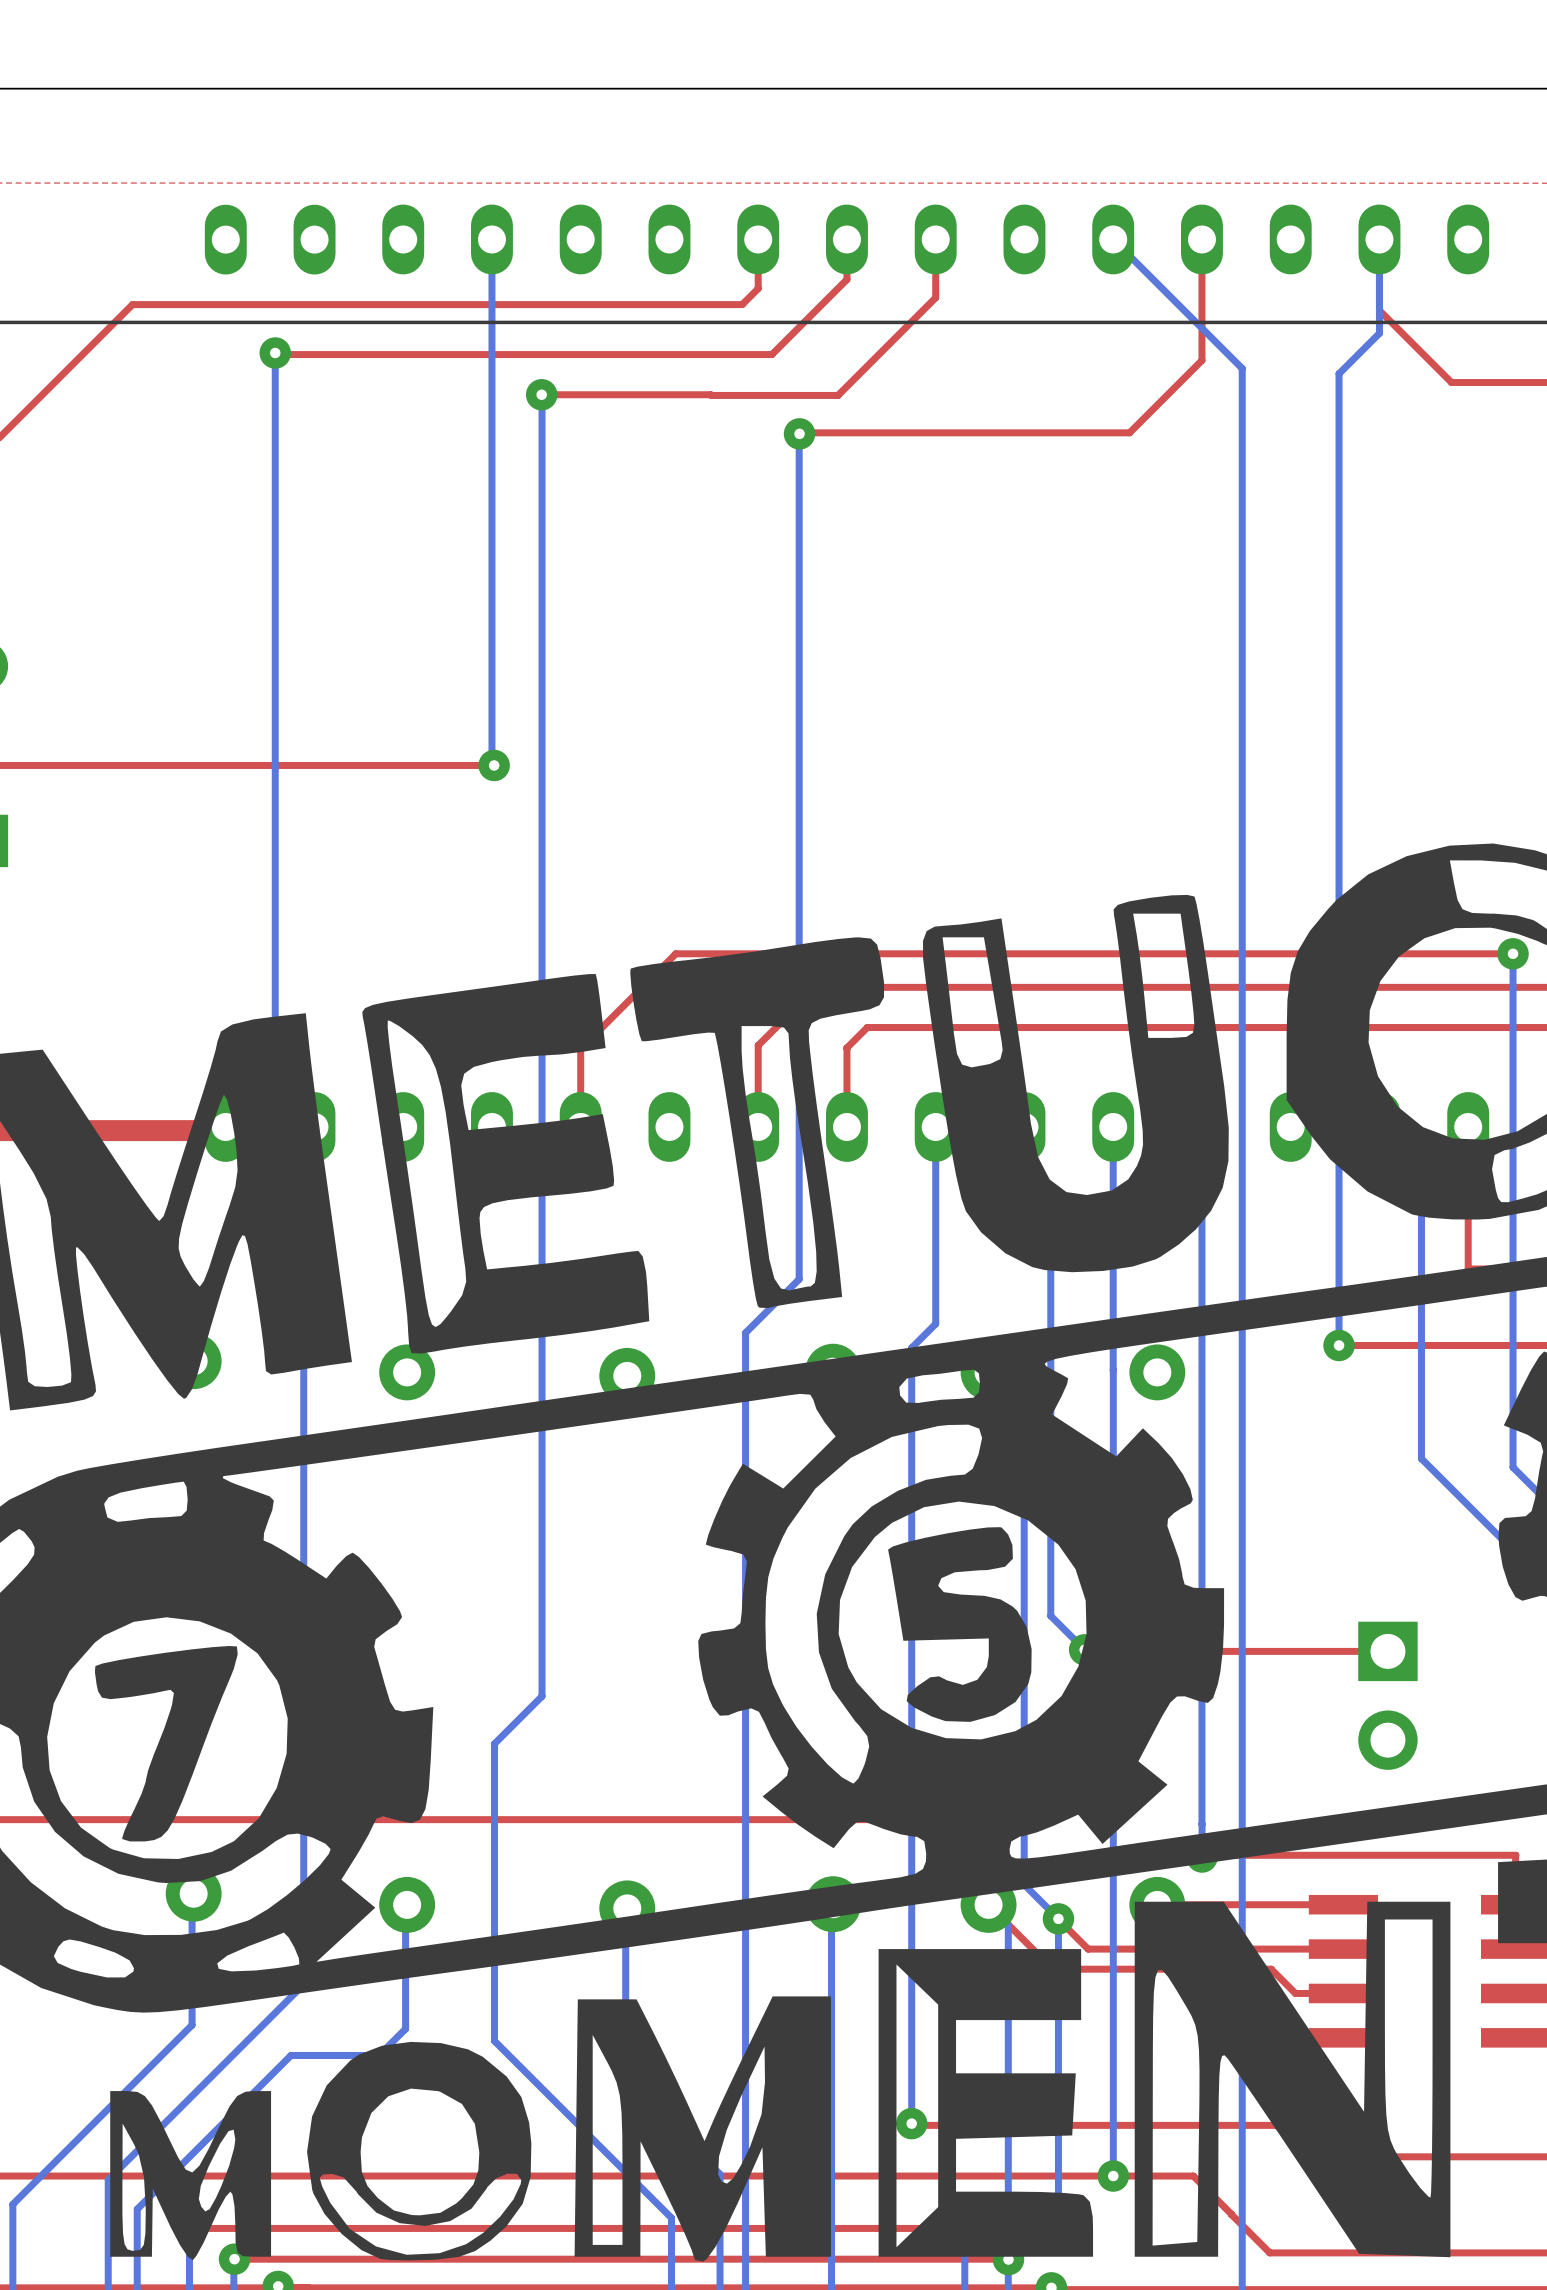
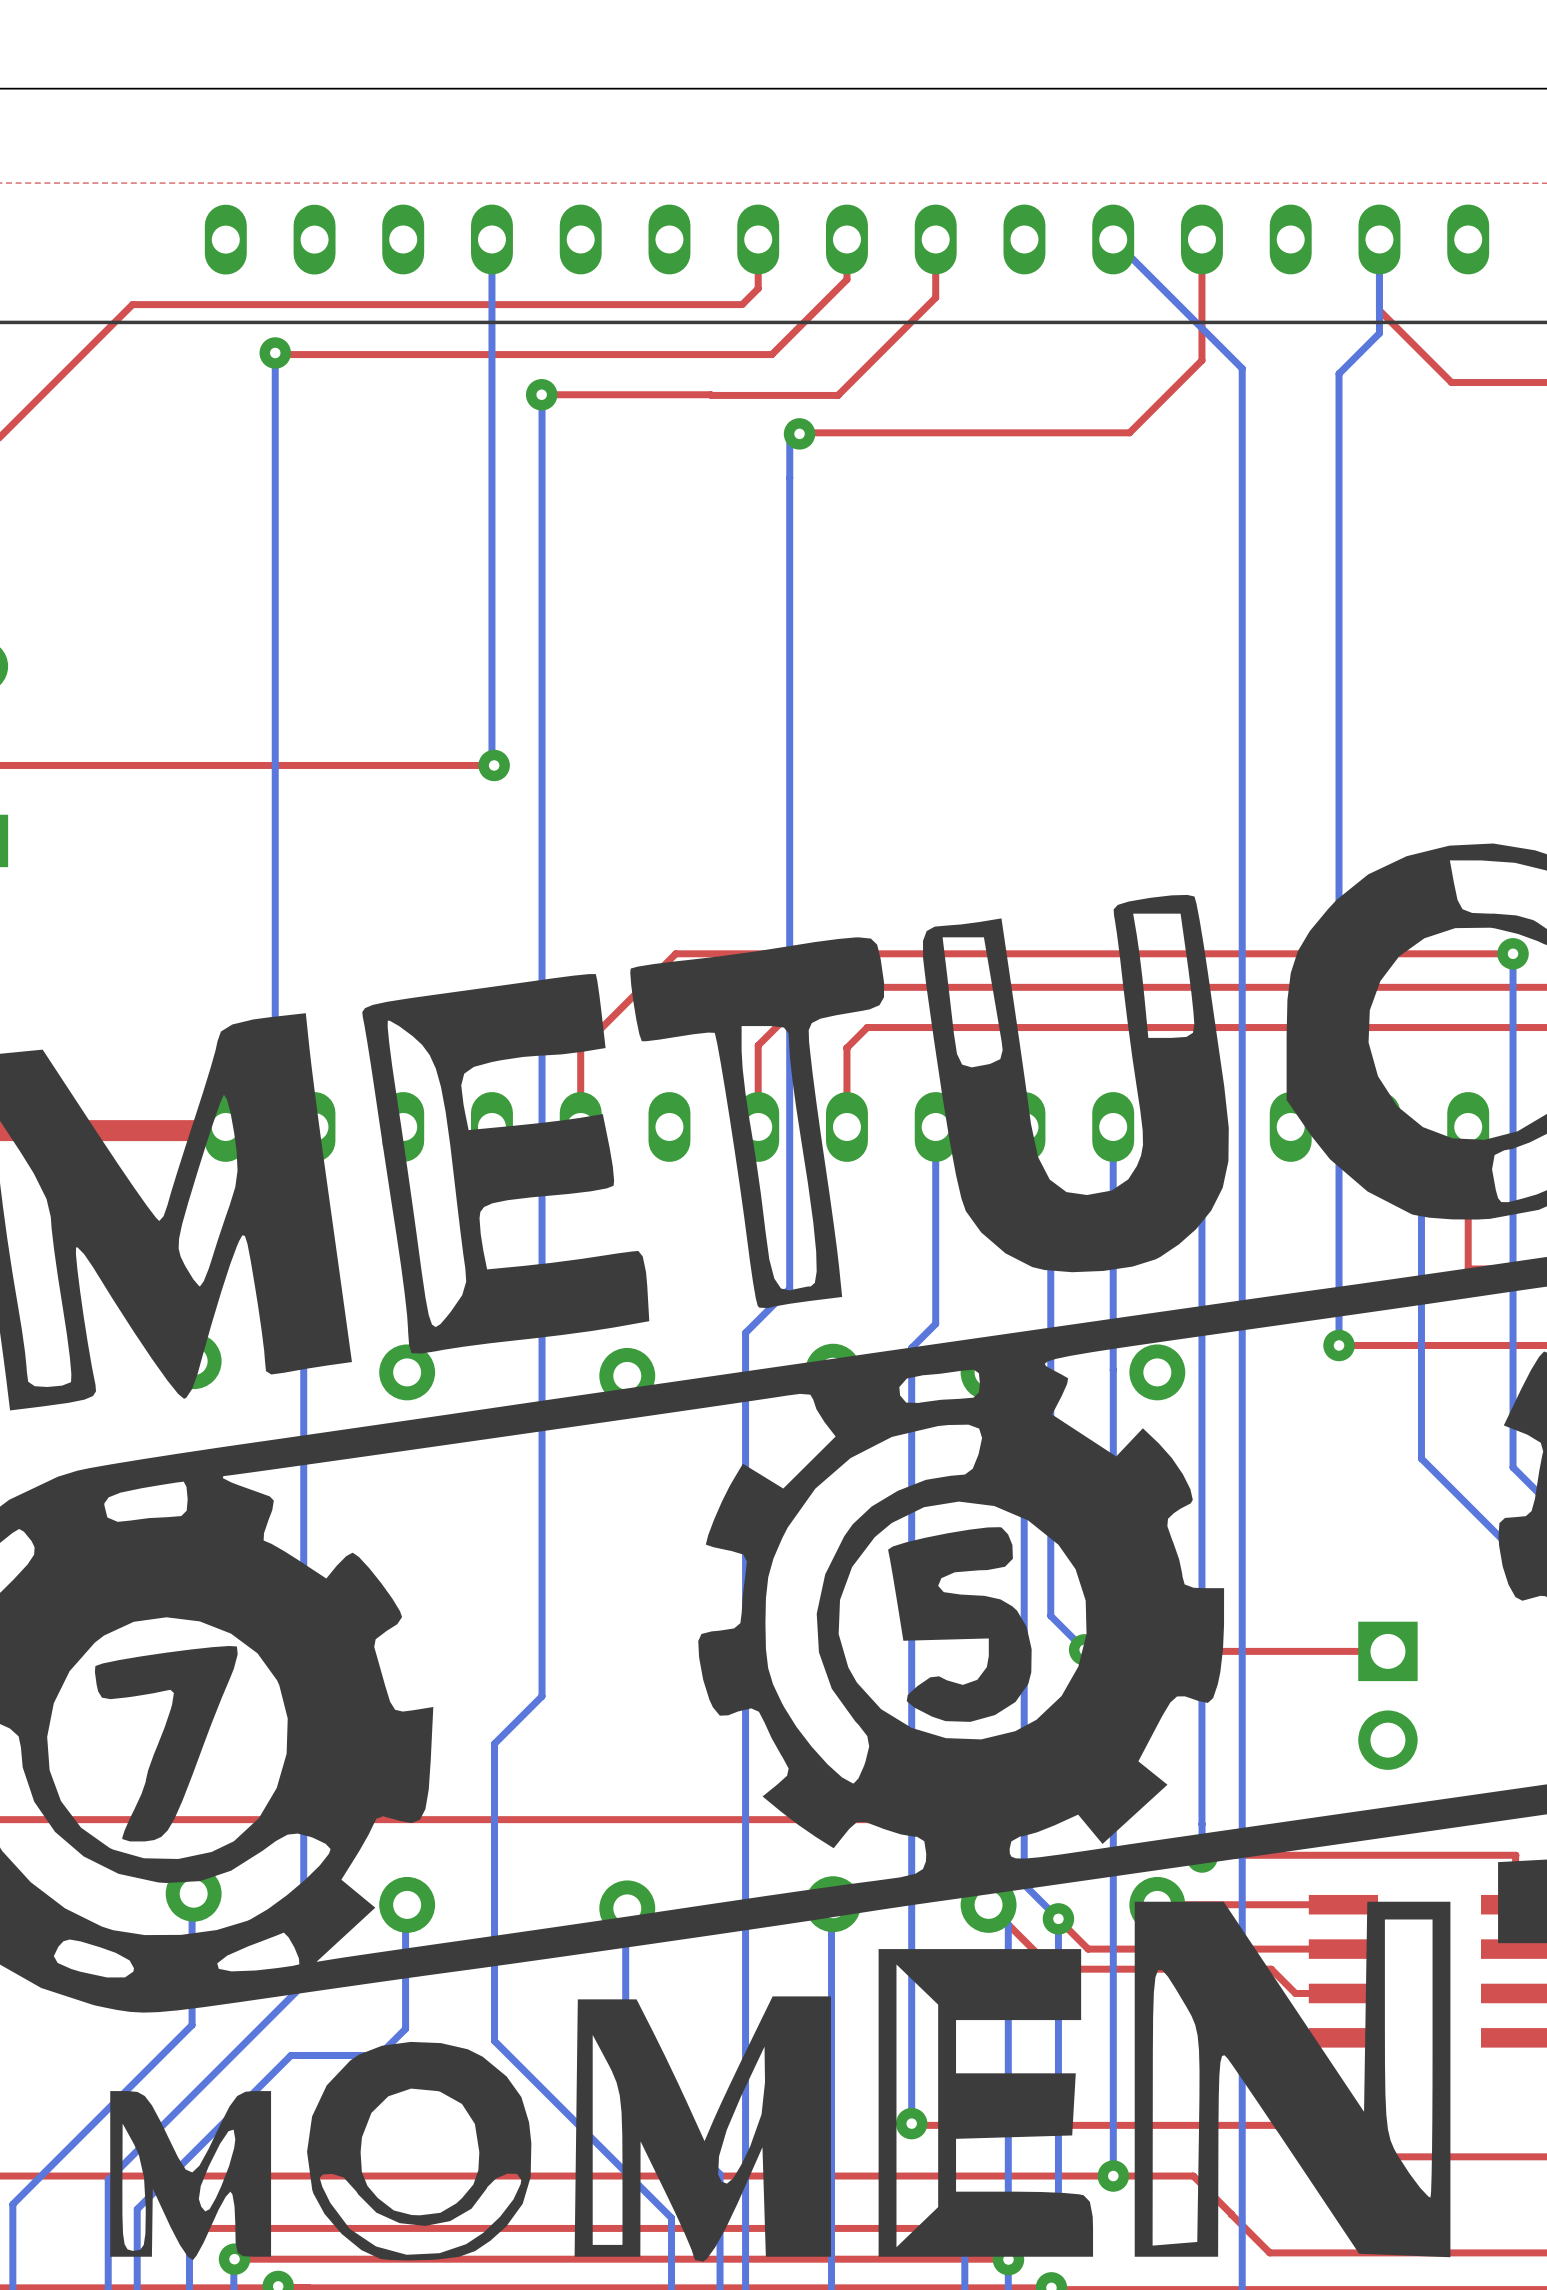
bottom track: (799, 445) (799, 1279) (789, 1288) -> (789, 432) (789, 1288)

